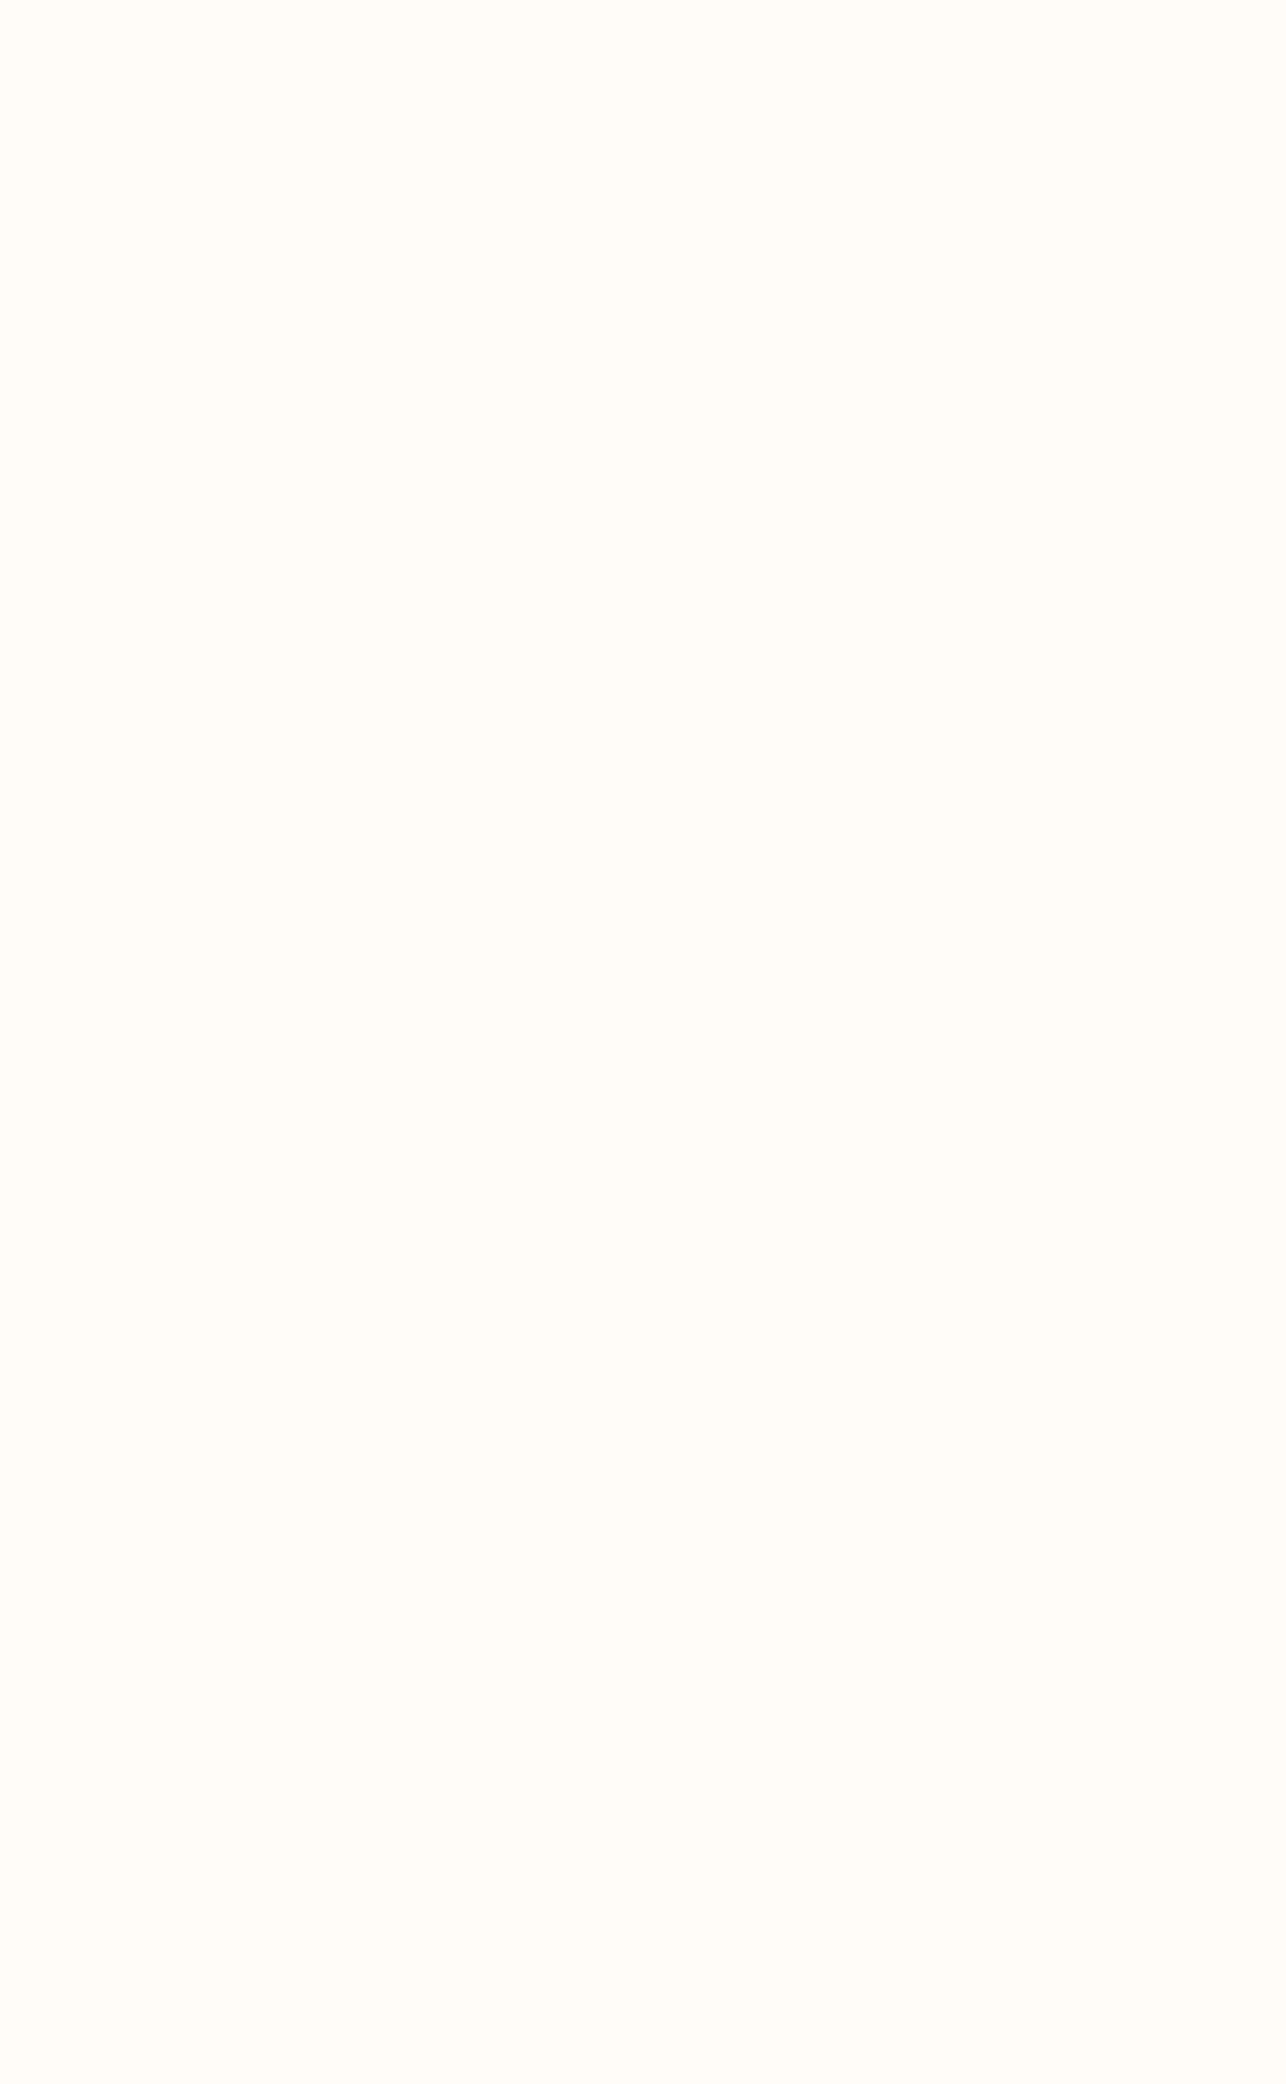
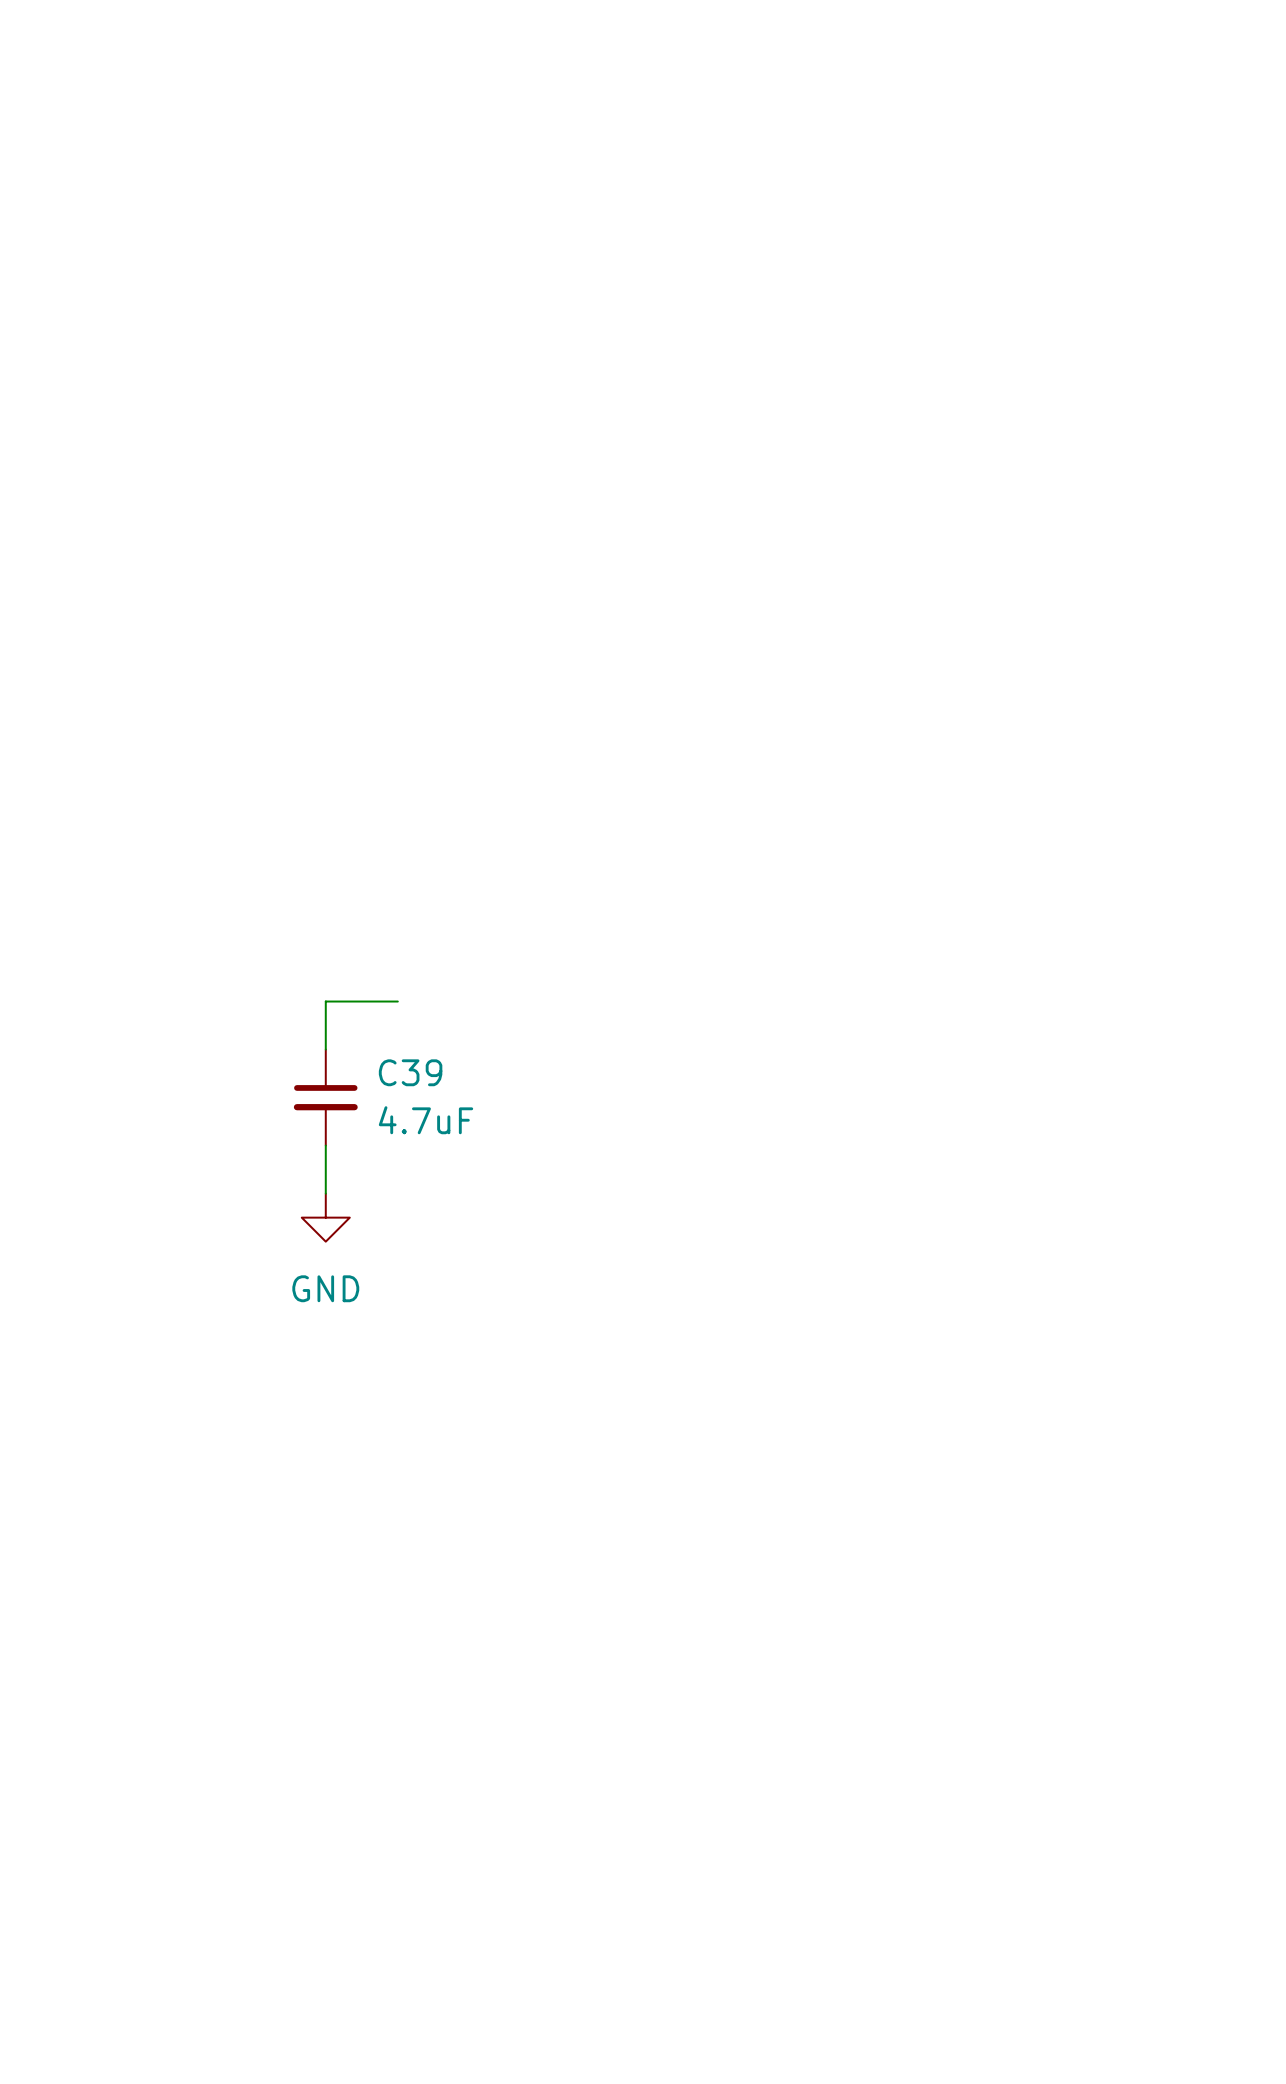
wire: none -> (397, 1001) (325, 1001) (325, 1049)
C39: none -> 4.7uF (325, 1097)
wire: none -> (325, 1145) (325, 1193)
power symbol: none -> GND (325, 1217)

